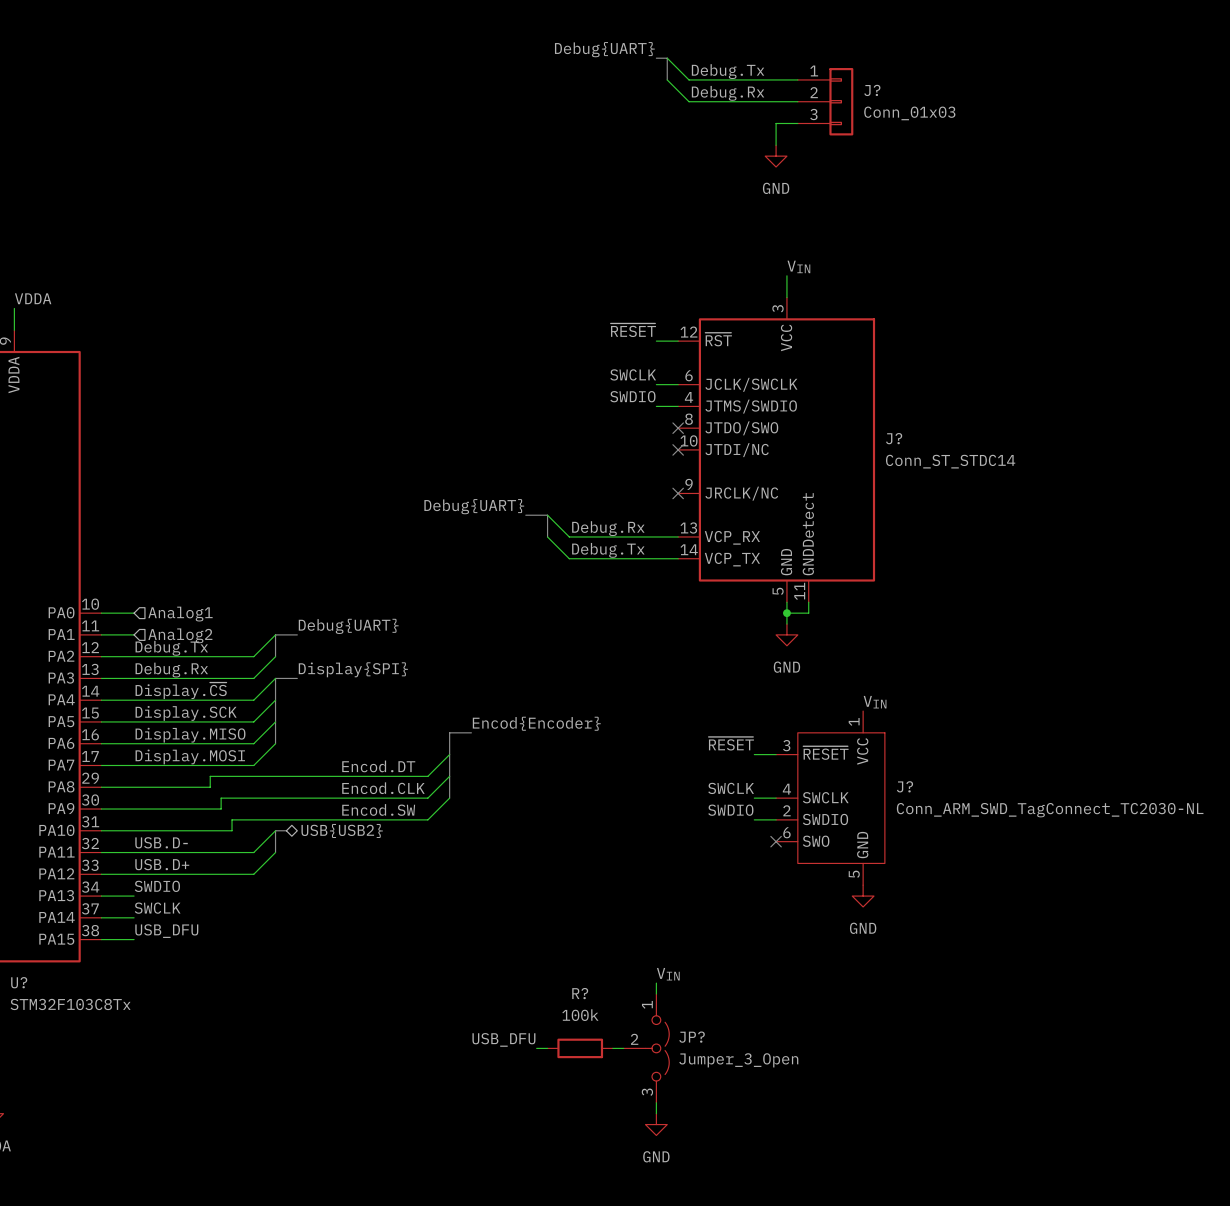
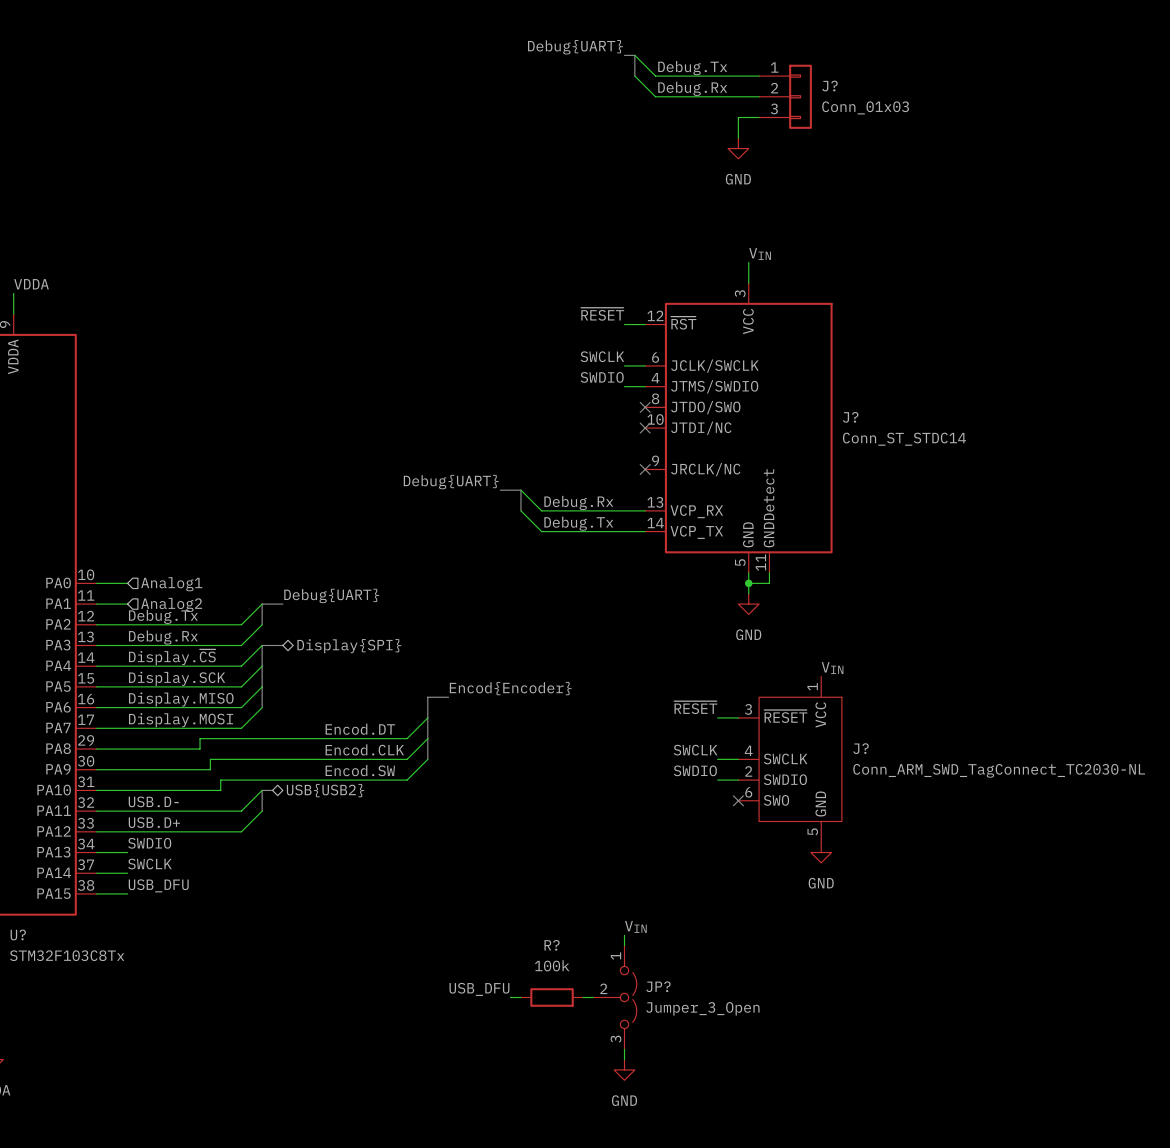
label: Display{SPI} (353, 669) -> none
hierarchical label: none -> Display{SPI} (349, 646)

